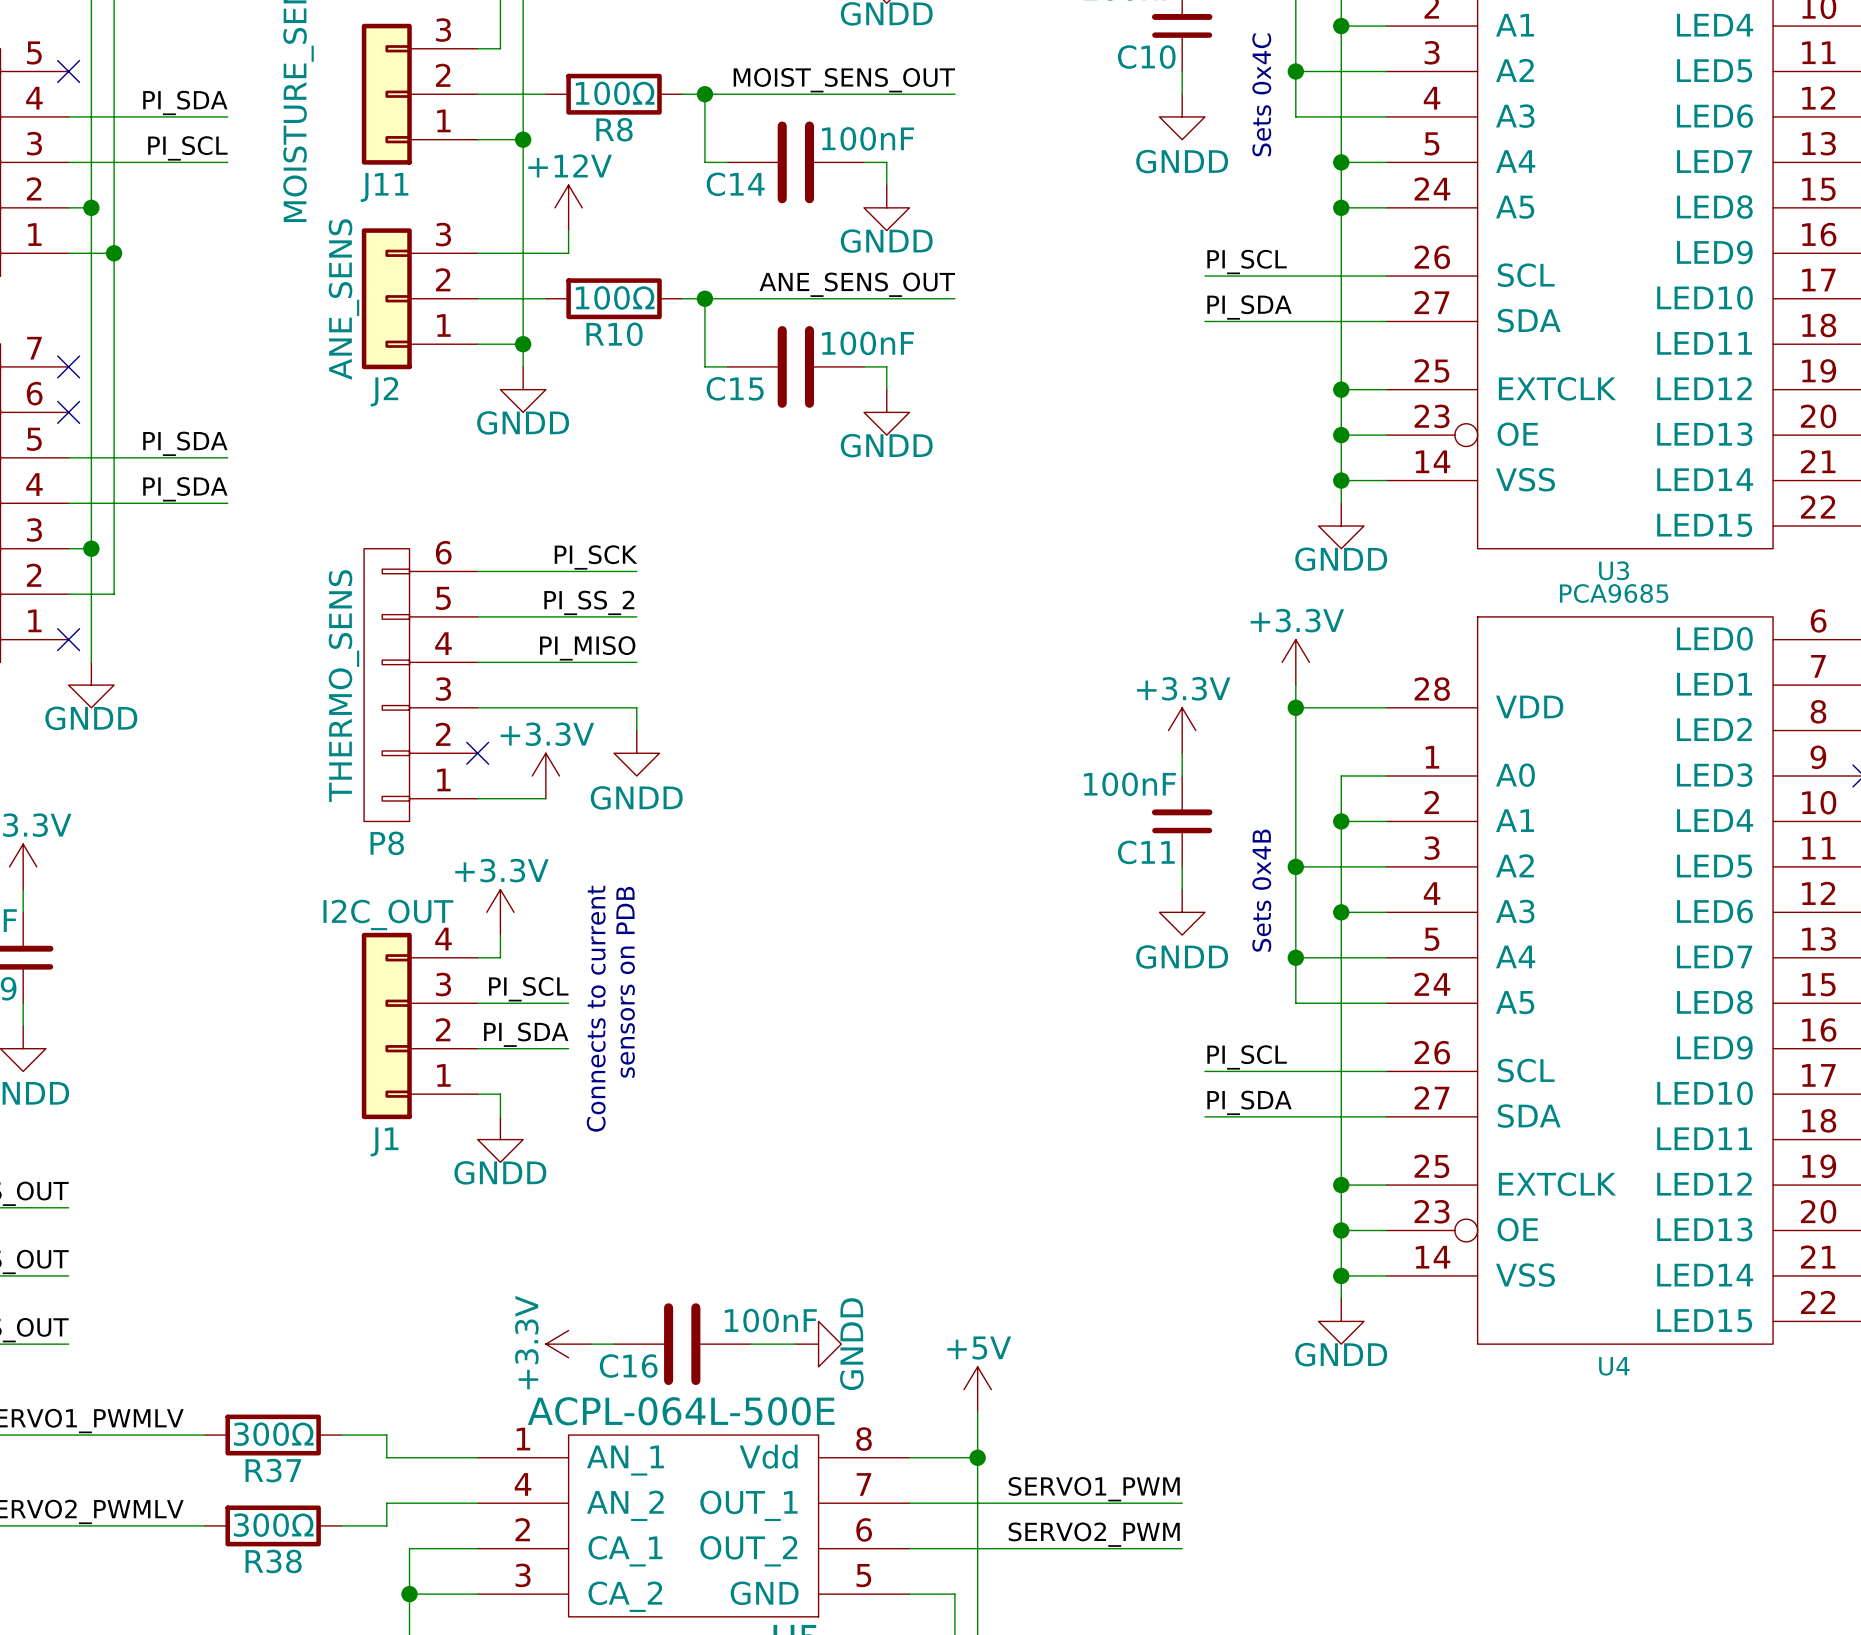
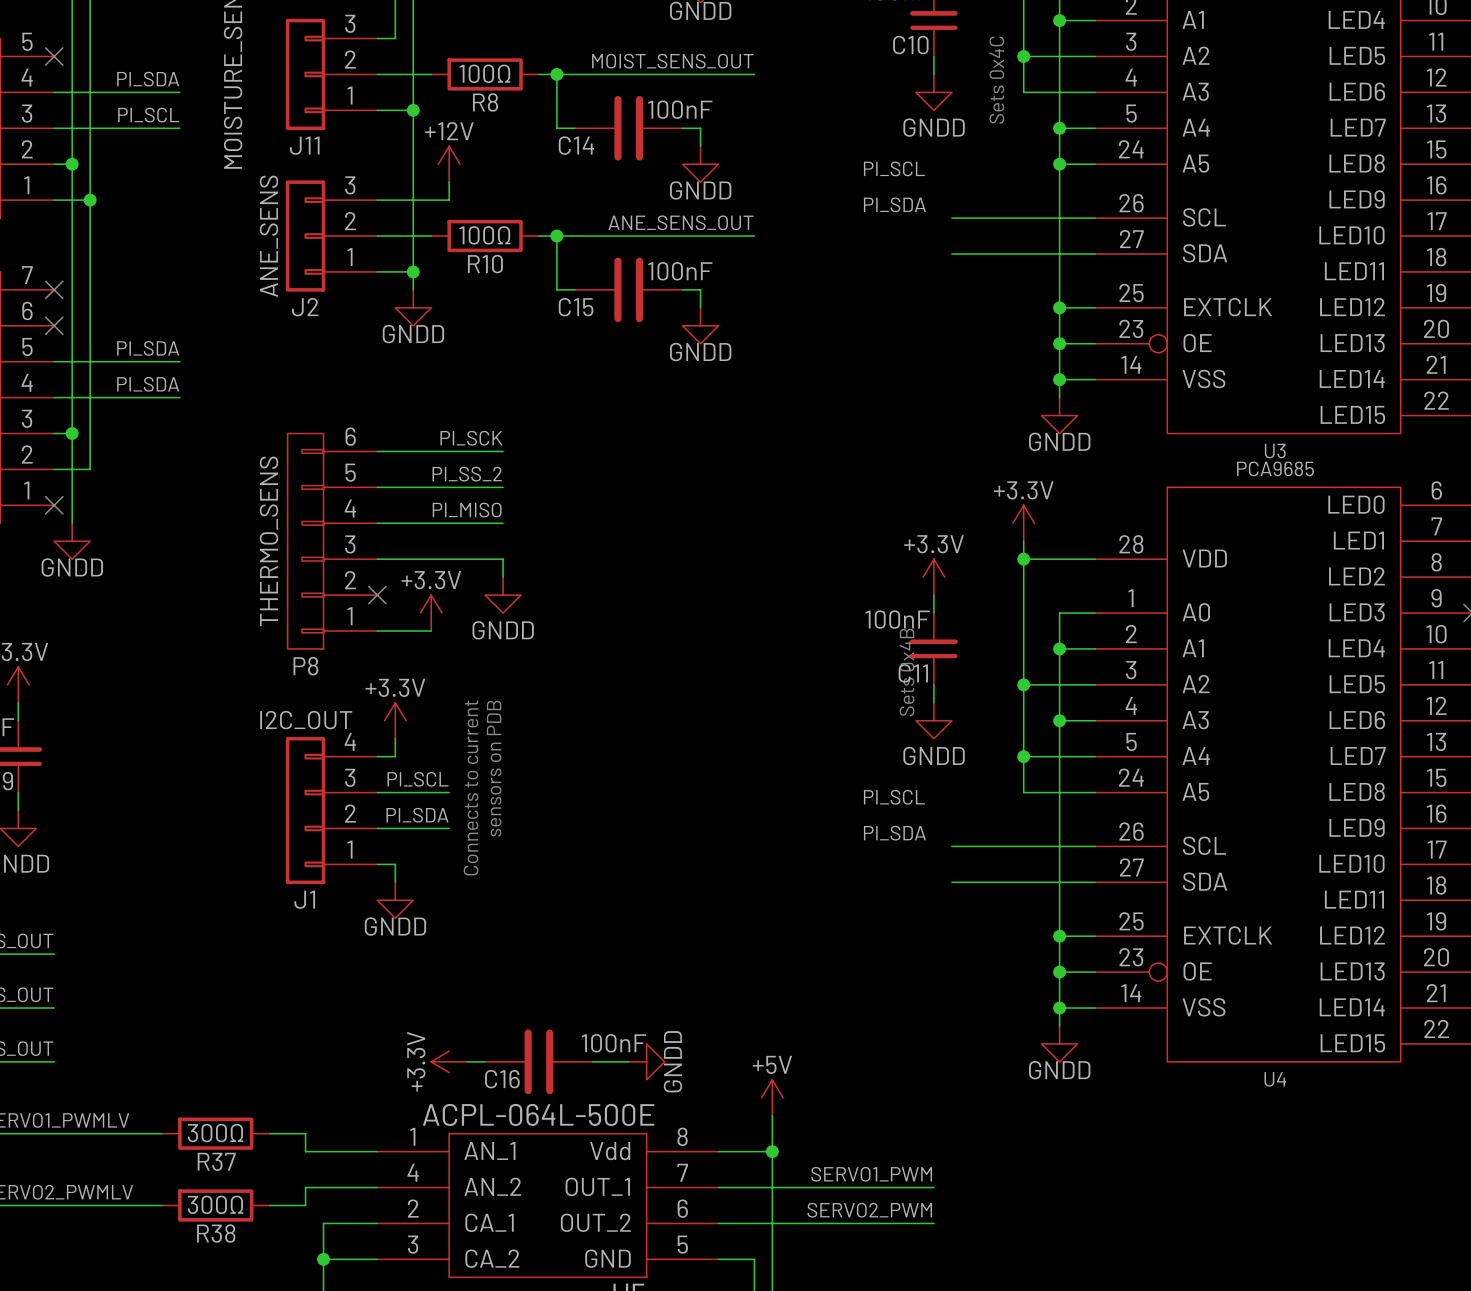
label position: PI_SCL (1247, 262) -> PI_SCL (894, 168)
label position: PI_SDA (1249, 307) -> PI_SDA (894, 204)
text position: Sets 0x4B (1261, 890) -> Sets 0x4B (907, 672)
label position: PI_SCL (1247, 1057) -> PI_SCL (894, 797)
label position: PI_SDA (1249, 1102) -> PI_SDA (894, 833)

